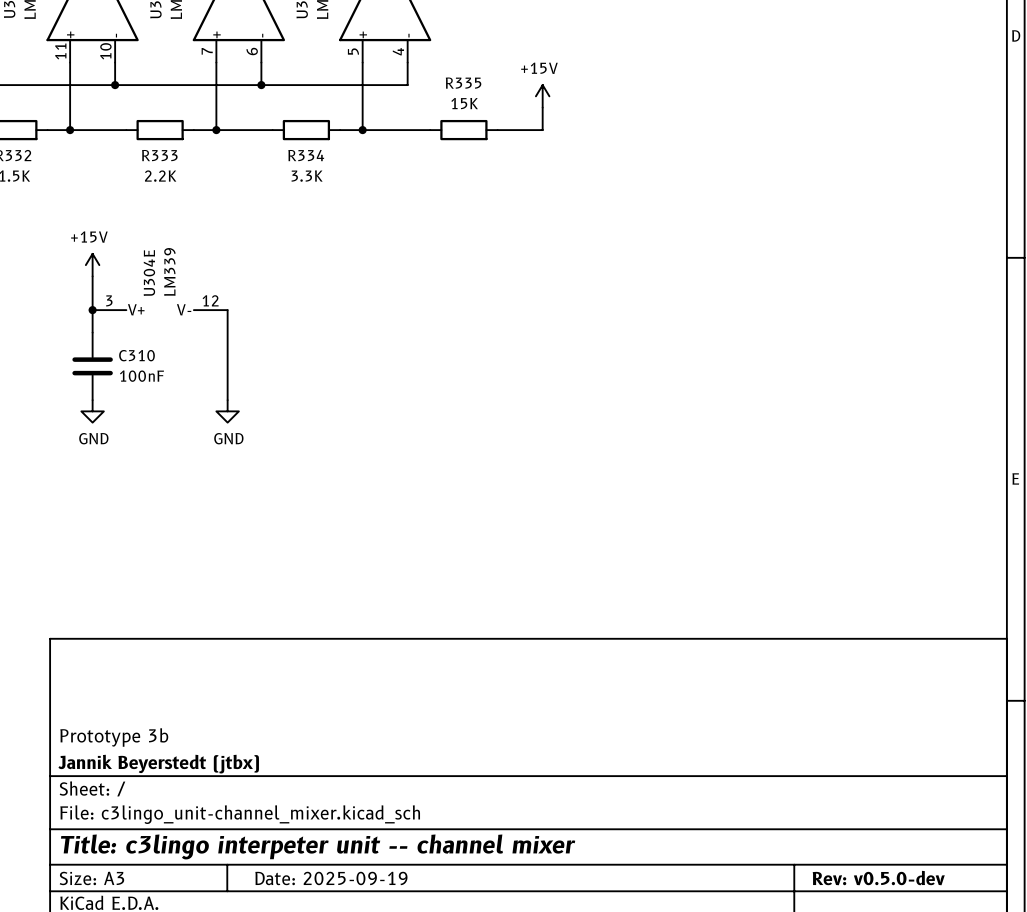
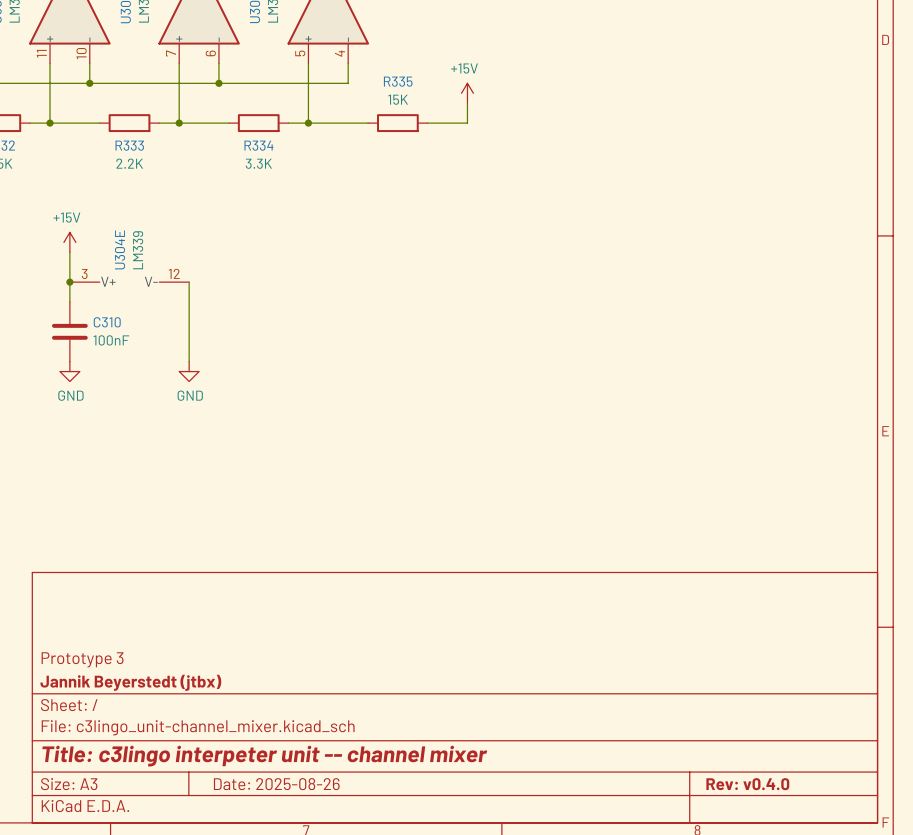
title block: Prototype 3b (114, 737) -> Prototype 3 (82, 659)
title block: Date: 2025-09-19 (331, 878) -> Date: 2025-08-26 (276, 784)
title block: Rev: v0.5.0-dev (878, 878) -> Rev: v0.4.0 (747, 784)

